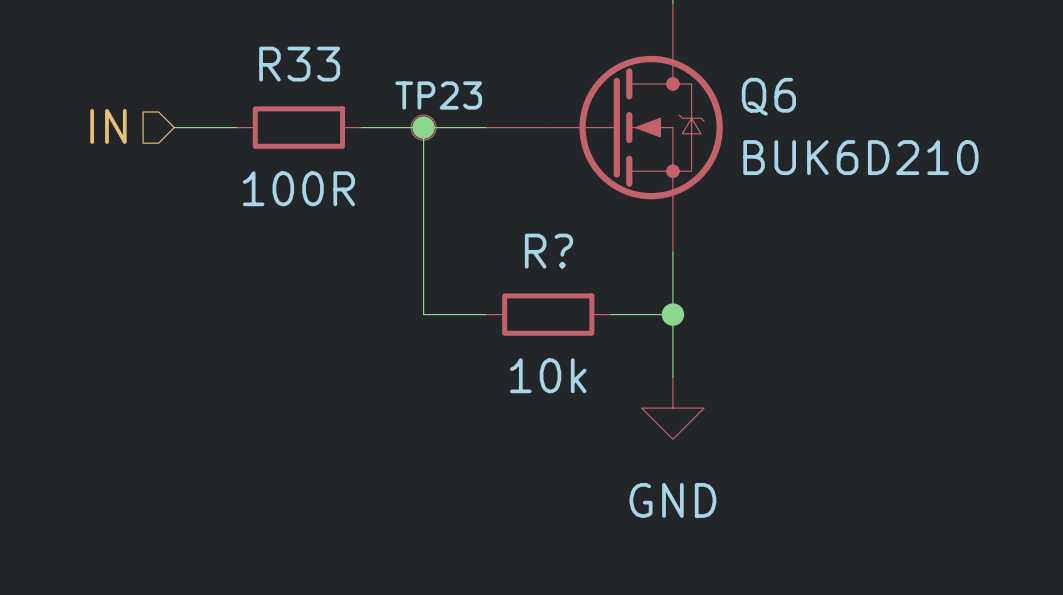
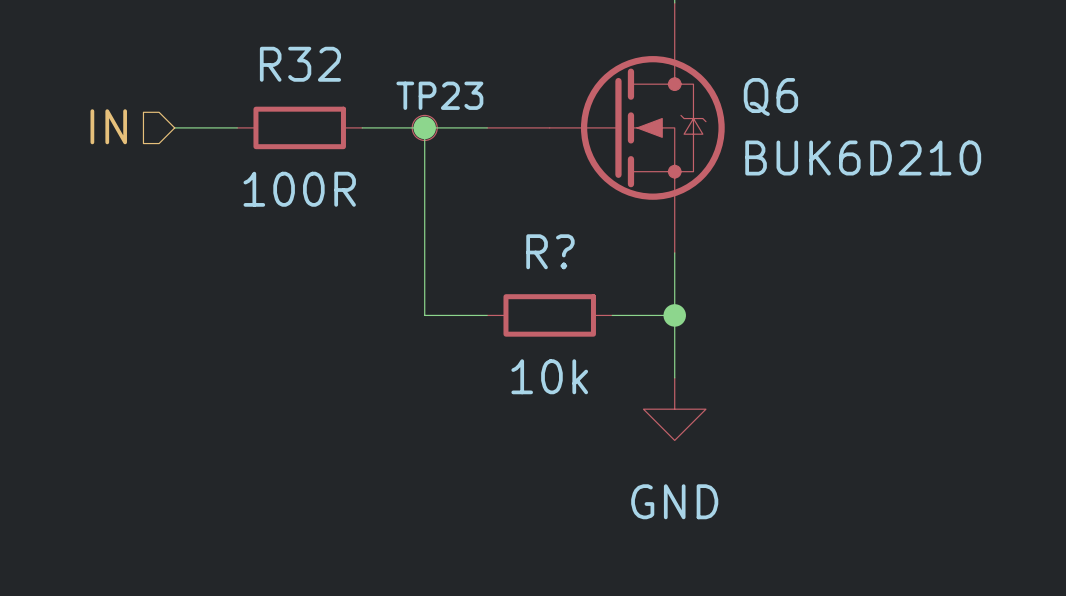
R33 name: R33 (299, 64) -> R32 (300, 64)

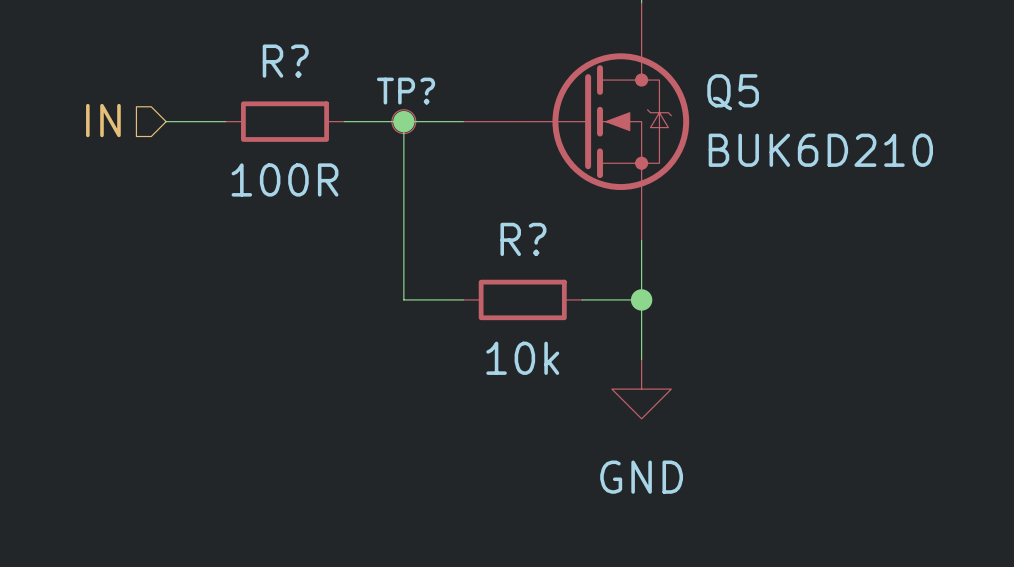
R32 name: R32 (300, 64) -> R? (285, 61)
TP23 name: TP23 (439, 95) -> TP? (406, 91)
Q6 name: Q6 (770, 96) -> Q5 (733, 92)

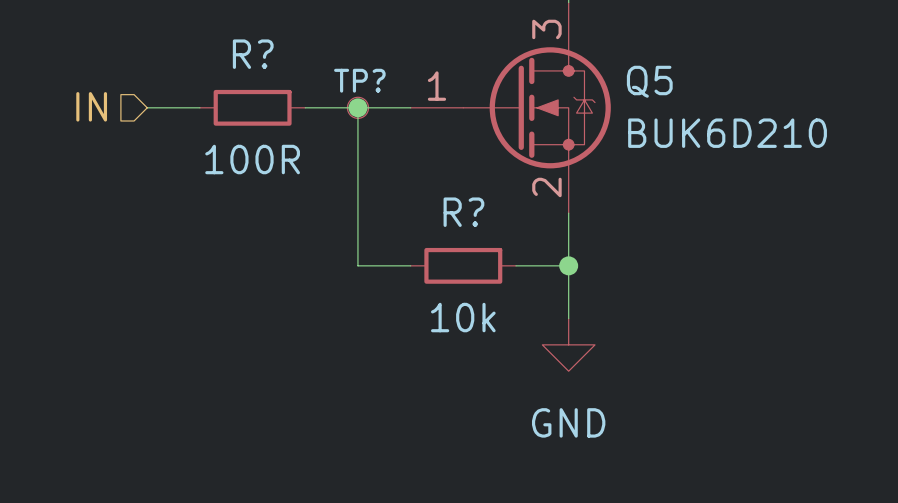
Q5 pin number: none -> 3 (546, 29)
Q5 pin number: none -> 1 (436, 86)
Q5 pin number: none -> 2 (546, 187)

